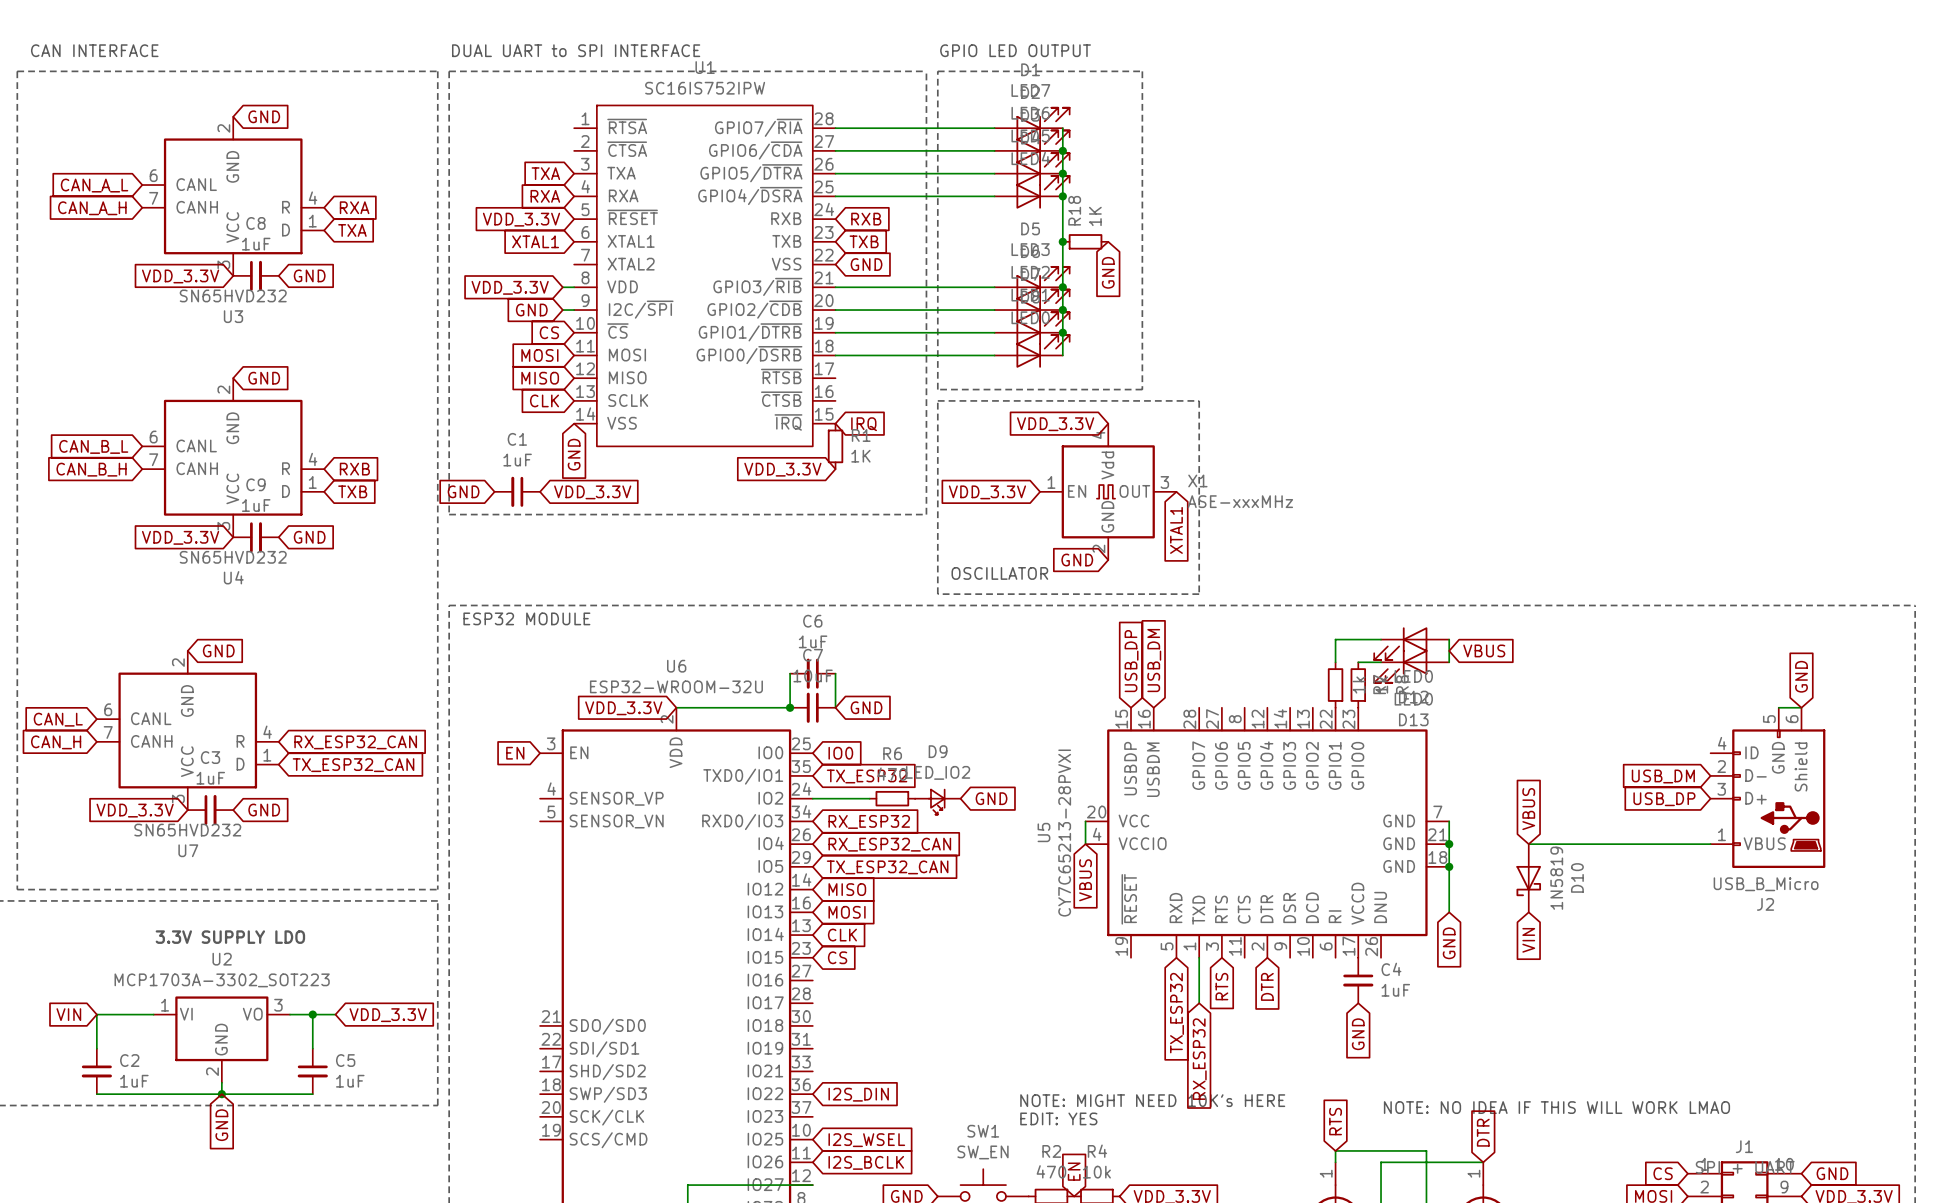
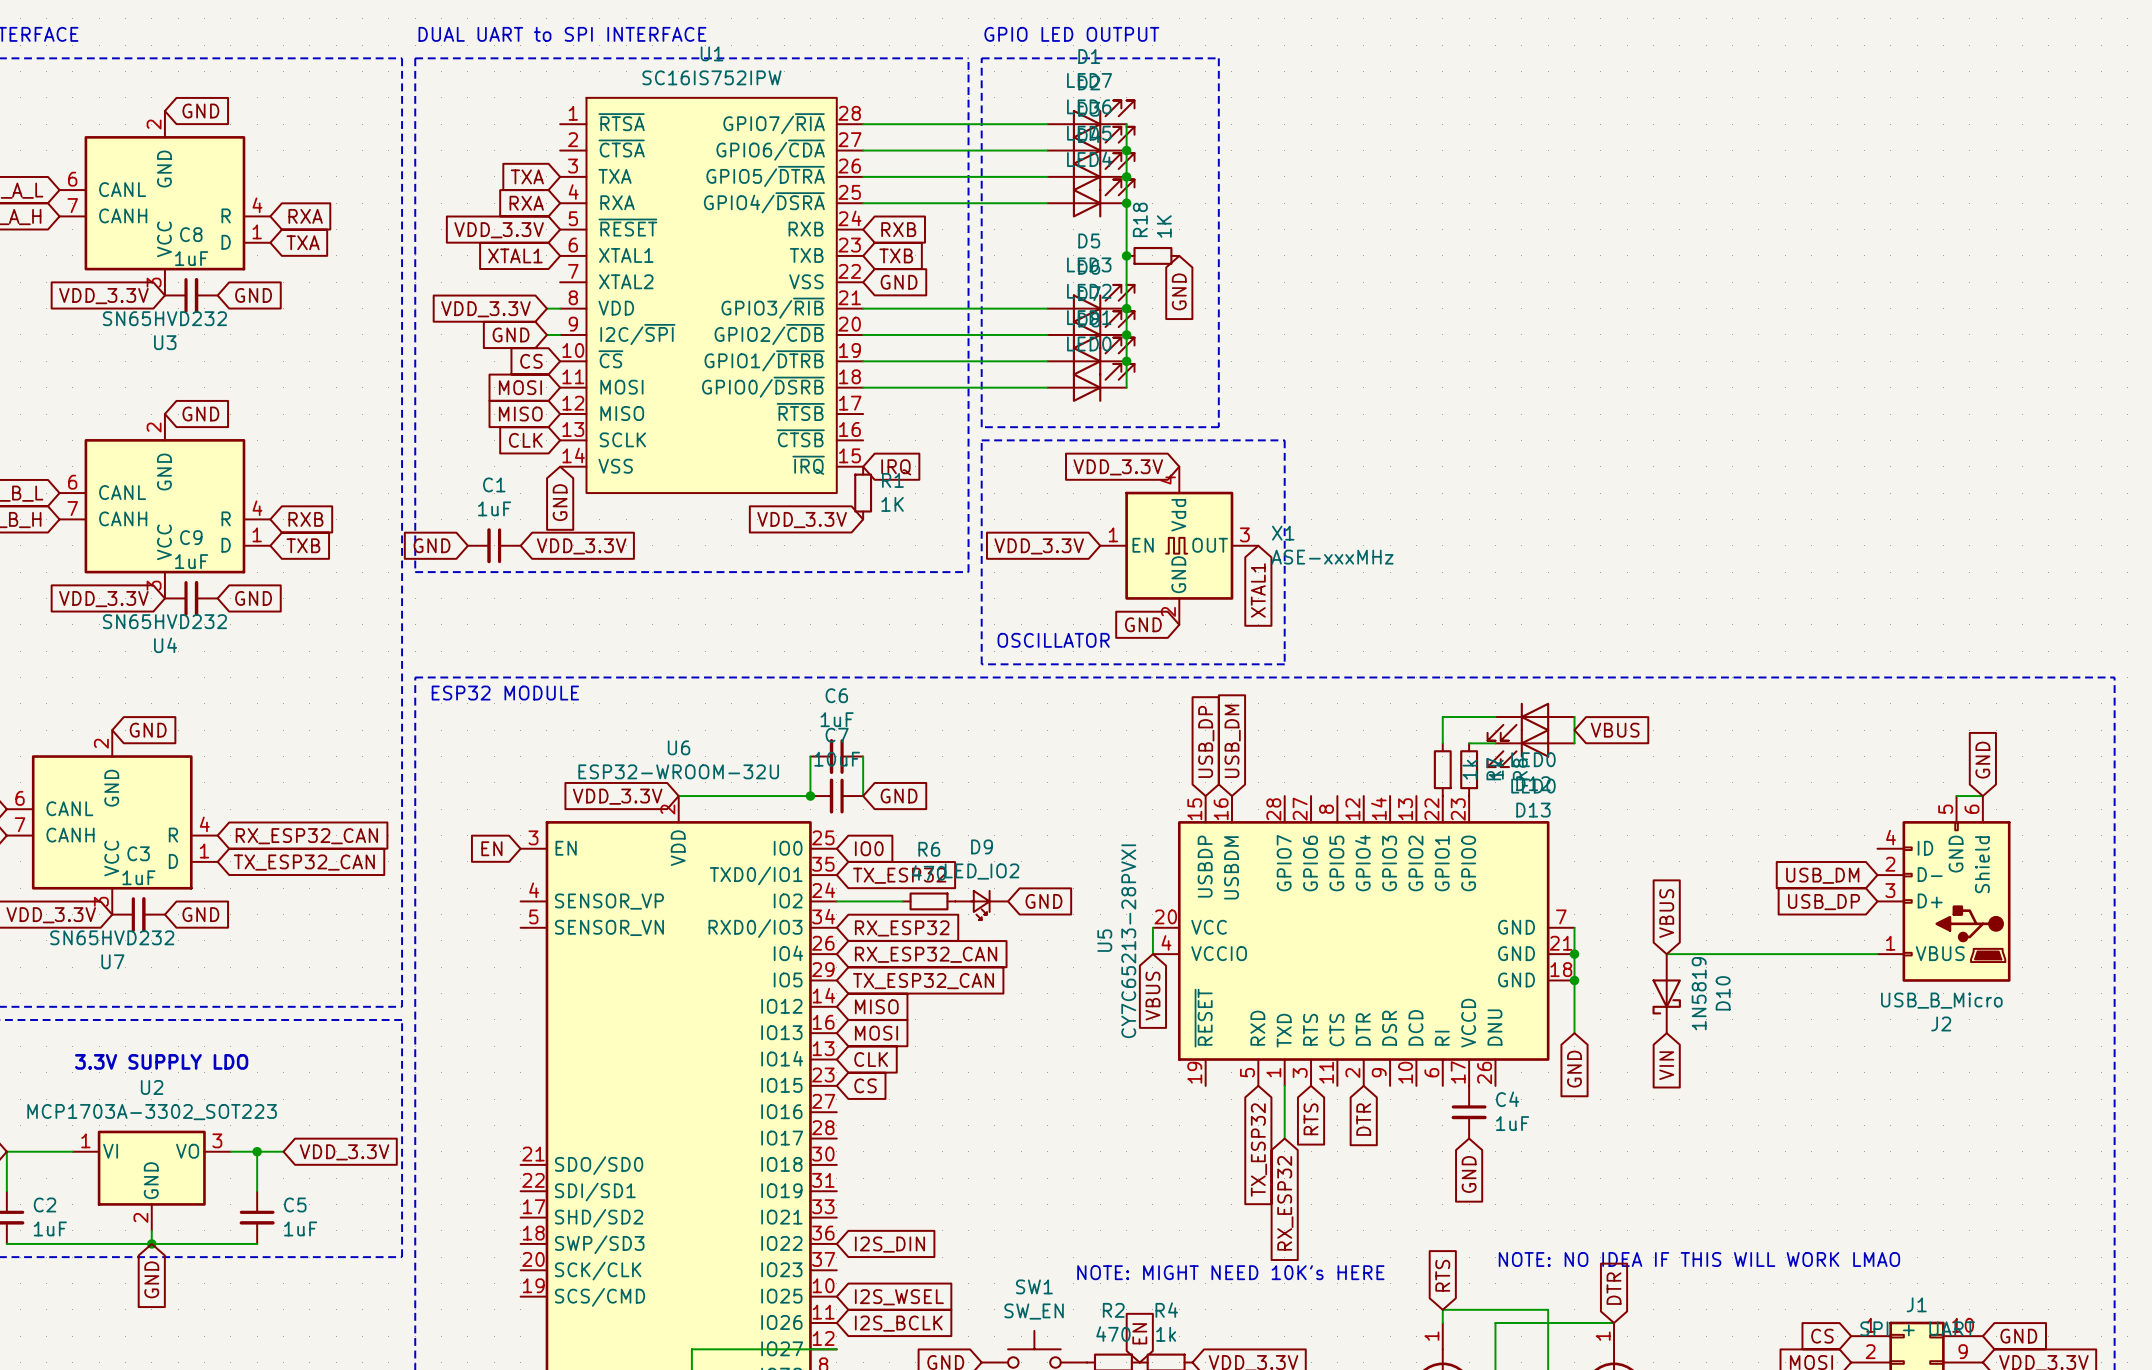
text: NOTE: MIGHT NEED 10K's HERE (1152, 1100) -> none
text: EDIT: YES (1058, 1118) -> NOTE: MIGHT NEED 10K's HERE (1230, 1272)
R4 value: 10k (1096, 1172) -> 1k (1166, 1334)

